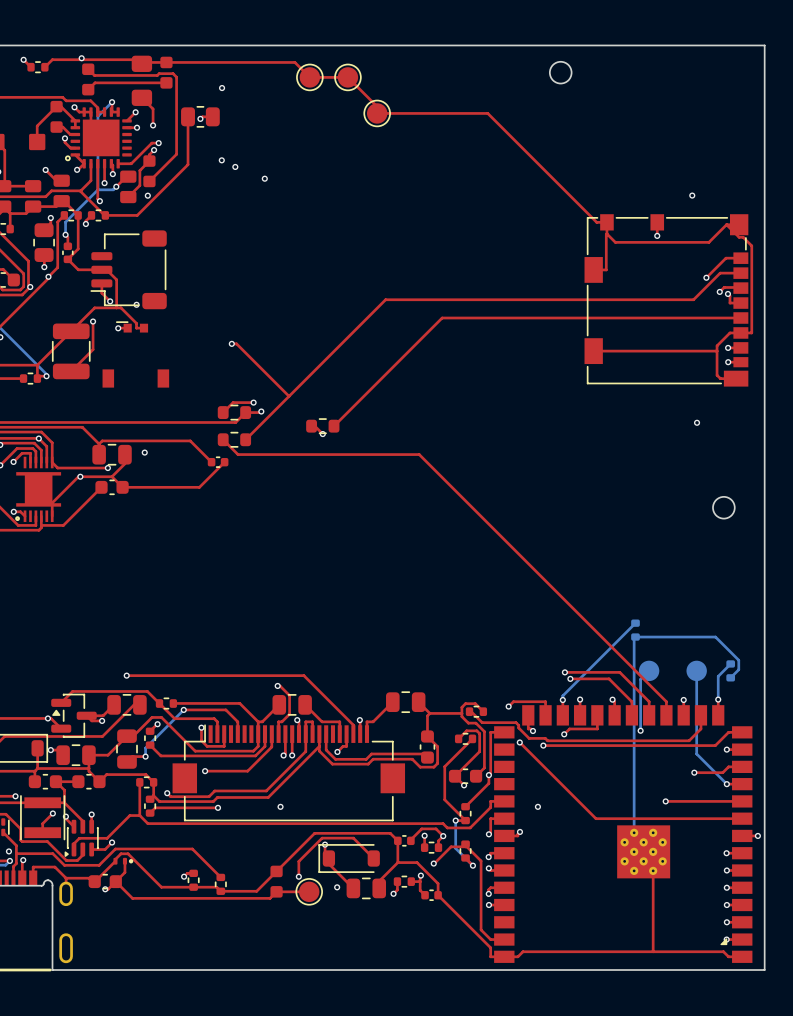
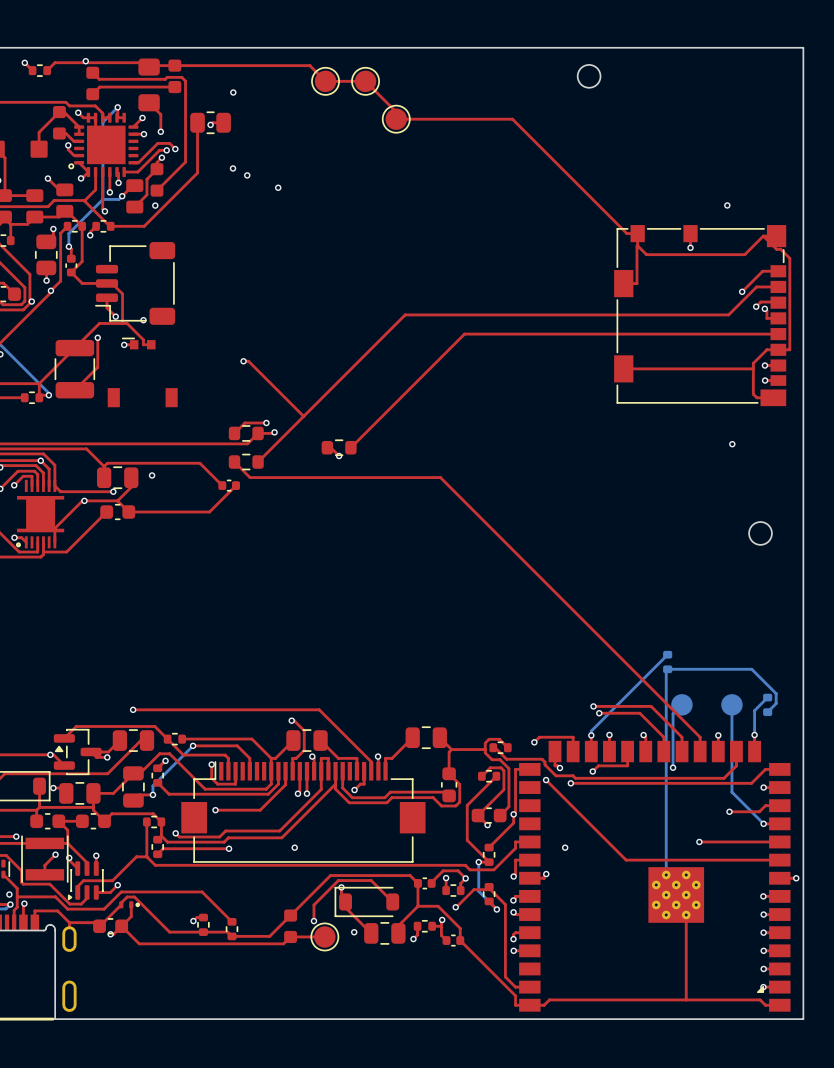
top track: none -> (175, 149) (169, 143) (157, 143) (138, 162) (133, 162)
via: none -> (175, 149)

